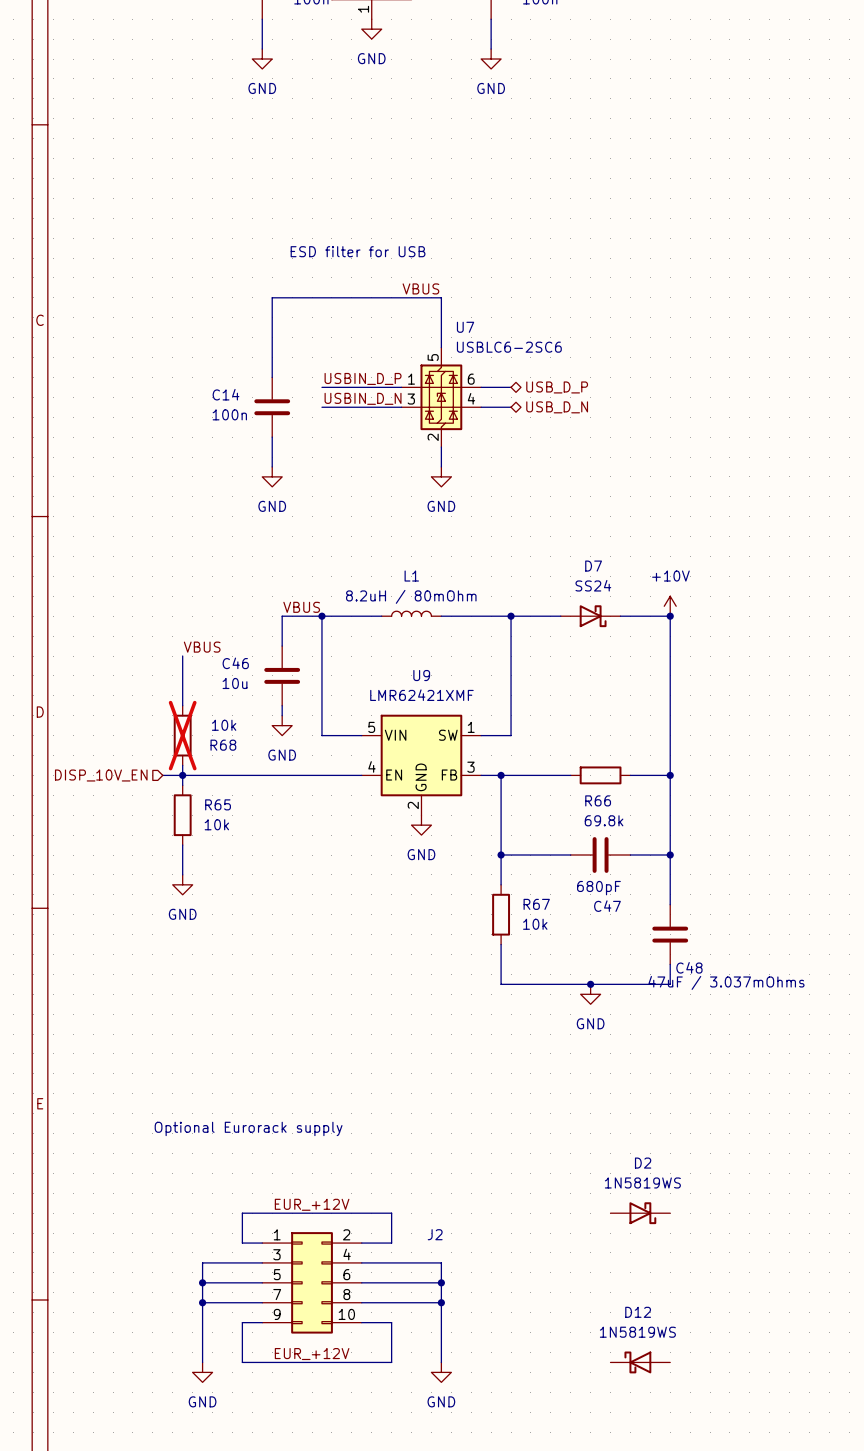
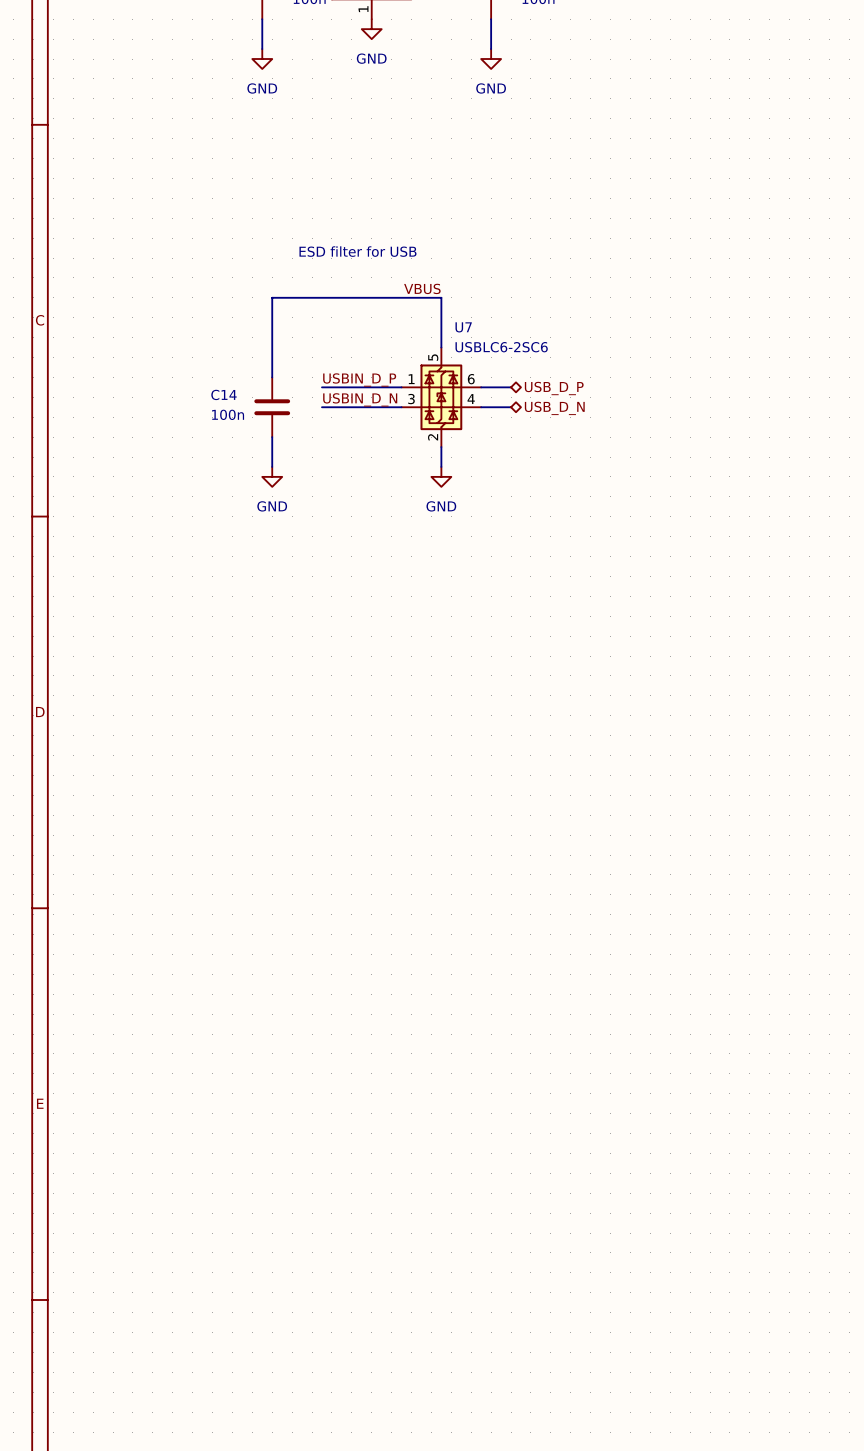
power symbol: +10V (670, 606) -> none
label: VBUS (301, 607) -> none
L1: 8.2uH / 80mOhm (411, 613) -> none
wire: (321, 616) (321, 735) (361, 735) -> none
junction: (321, 616) -> none
wire: (381, 616) (282, 616) (282, 646) -> none
wire: (441, 616) (560, 616) -> none
wire: (511, 616) (511, 735) (481, 735) -> none
junction: (511, 616) -> none
D7: SS24 (590, 616) -> none
wire: (620, 616) (670, 616) (670, 904) -> none
junction: (670, 616) -> none
label: VBUS (202, 647) -> none
wire: (182, 656) (182, 705) -> none
C46: 10u (282, 675) -> none
wire: (282, 705) (282, 715) -> none
power symbol: GND (282, 725) -> none
R68: 10k (182, 735) -> none
U9: LMR62421XMF (421, 764) -> none
wire: (182, 765) (182, 785) -> none
hierarchical label: DISP_10V_EN (101, 775) -> none
wire: (162, 775) (361, 775) -> none
junction: (182, 775) -> none
wire: (481, 775) (570, 775) -> none
wire: (501, 775) (501, 884) -> none
junction: (501, 775) -> none
R66: 69.8k (600, 775) -> none
wire: (630, 775) (670, 775) -> none
junction: (670, 775) -> none
R65: 10k (182, 815) -> none
power symbol: GND (421, 825) -> none
wire: (182, 845) (182, 874) -> none
wire: (501, 855) (570, 855) -> none
junction: (501, 855) -> none
C47: 680pF (600, 855) -> none
wire: (630, 855) (670, 855) -> none
junction: (670, 855) -> none
power symbol: GND (182, 884) -> none
R67: 10k (501, 914) -> none
C48: 47uF / 3.037mOhms (670, 934) -> none
wire: (501, 944) (501, 984) (670, 984) (670, 964) -> none
junction: (590, 984) -> none
power symbol: GND (590, 994) -> none
text: Optional Eurorack supply (248, 1128) -> none
label: EUR_+12V (312, 1204) -> none
D2: 1N5819WS (640, 1213) -> none
wire: (262, 1243) (242, 1243) (242, 1213) (391, 1213) (391, 1243) (361, 1243) -> none
wire: (262, 1262) (202, 1262) (202, 1362) -> none
wire: (361, 1262) (441, 1262) (441, 1362) -> none
wire: (202, 1282) (262, 1282) -> none
junction: (202, 1282) -> none
J2: (312, 1282) -> none
wire: (361, 1282) (441, 1282) -> none
junction: (441, 1282) -> none
wire: (202, 1302) (262, 1302) -> none
junction: (202, 1302) -> none
wire: (361, 1302) (441, 1302) -> none
junction: (441, 1302) -> none
wire: (262, 1322) (242, 1322) (242, 1362) (391, 1362) (391, 1322) (361, 1322) -> none
label: EUR_+12V (312, 1354) -> none
D12: 1N5819WS (640, 1362) -> none
power symbol: GND (202, 1372) -> none
power symbol: GND (441, 1372) -> none

